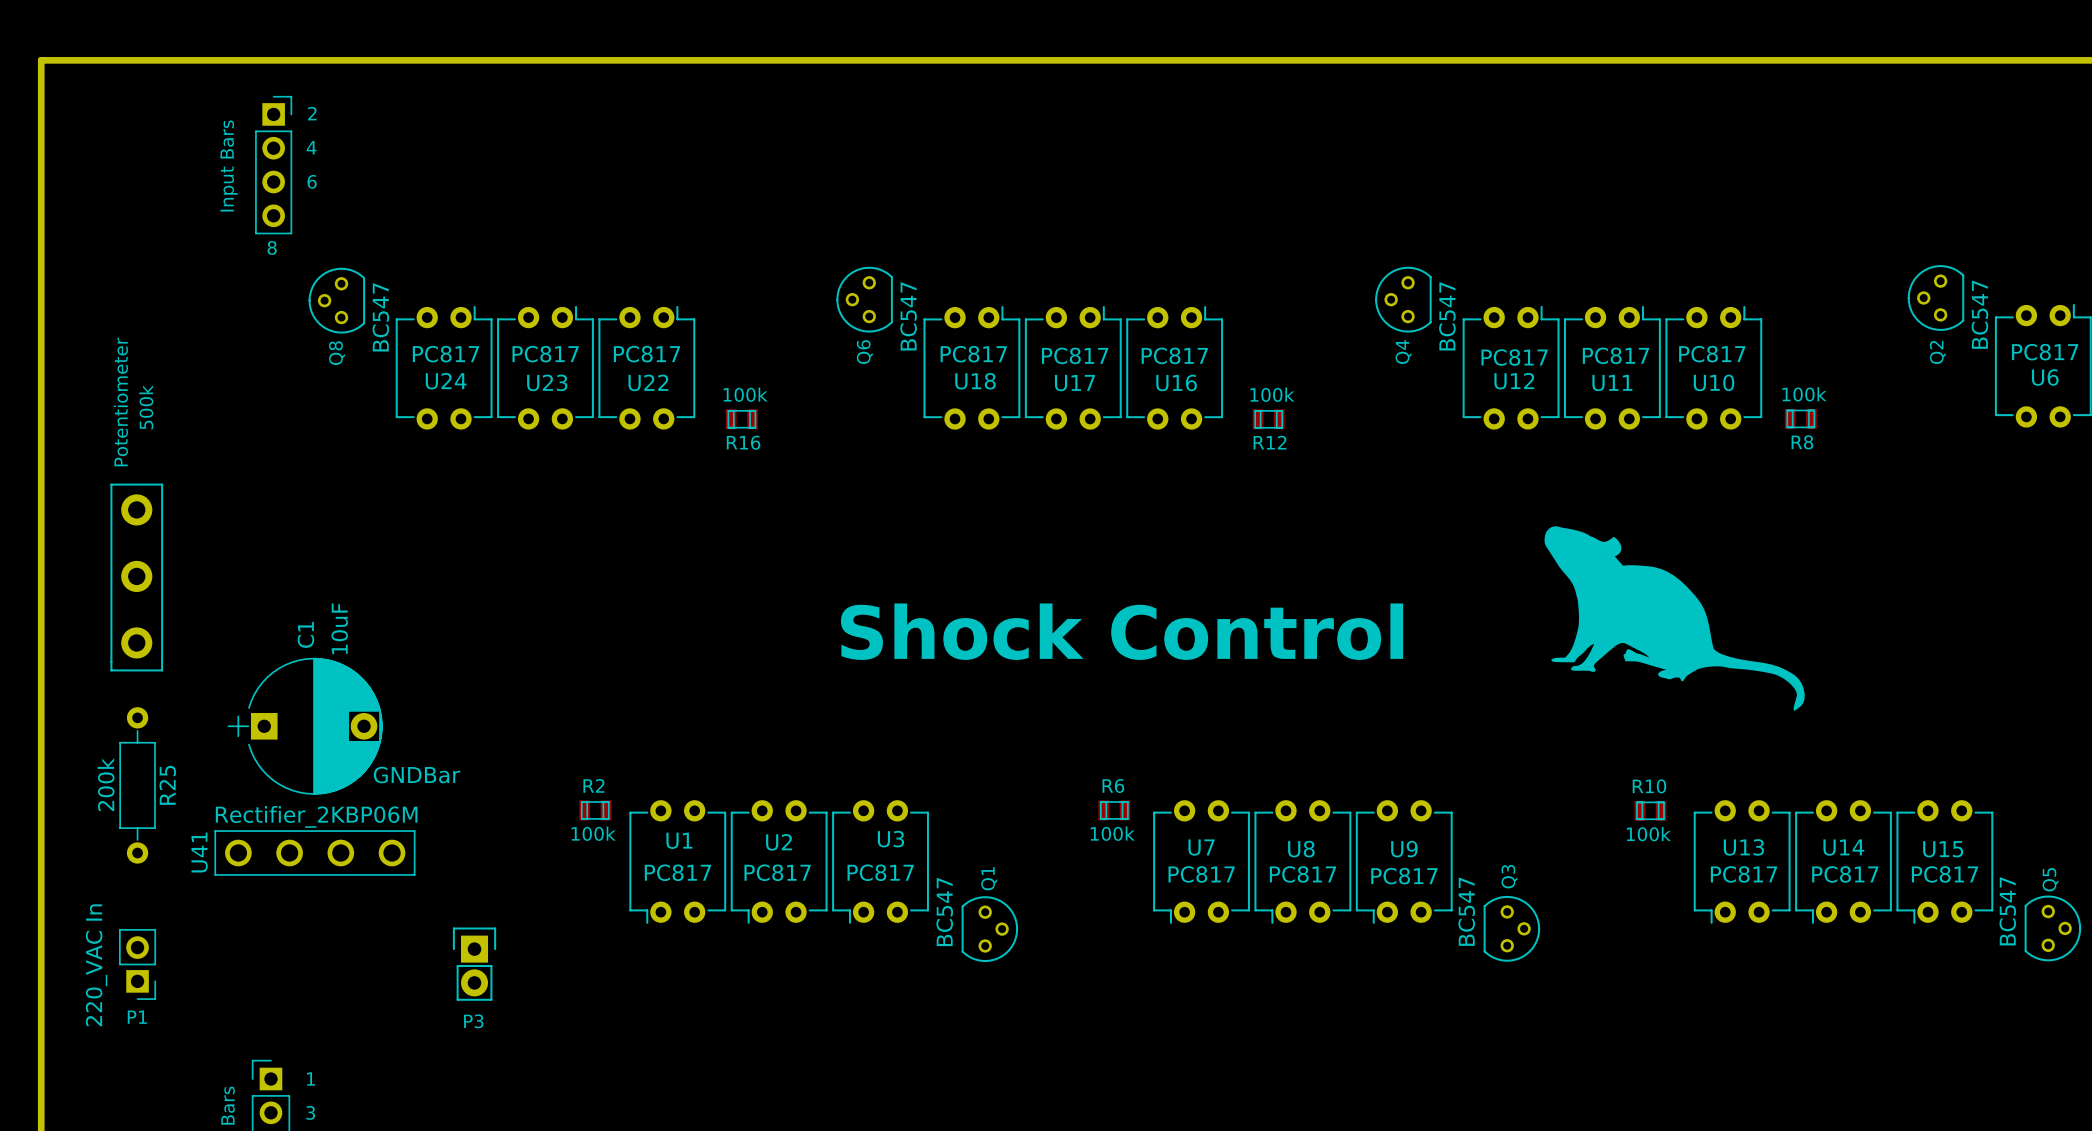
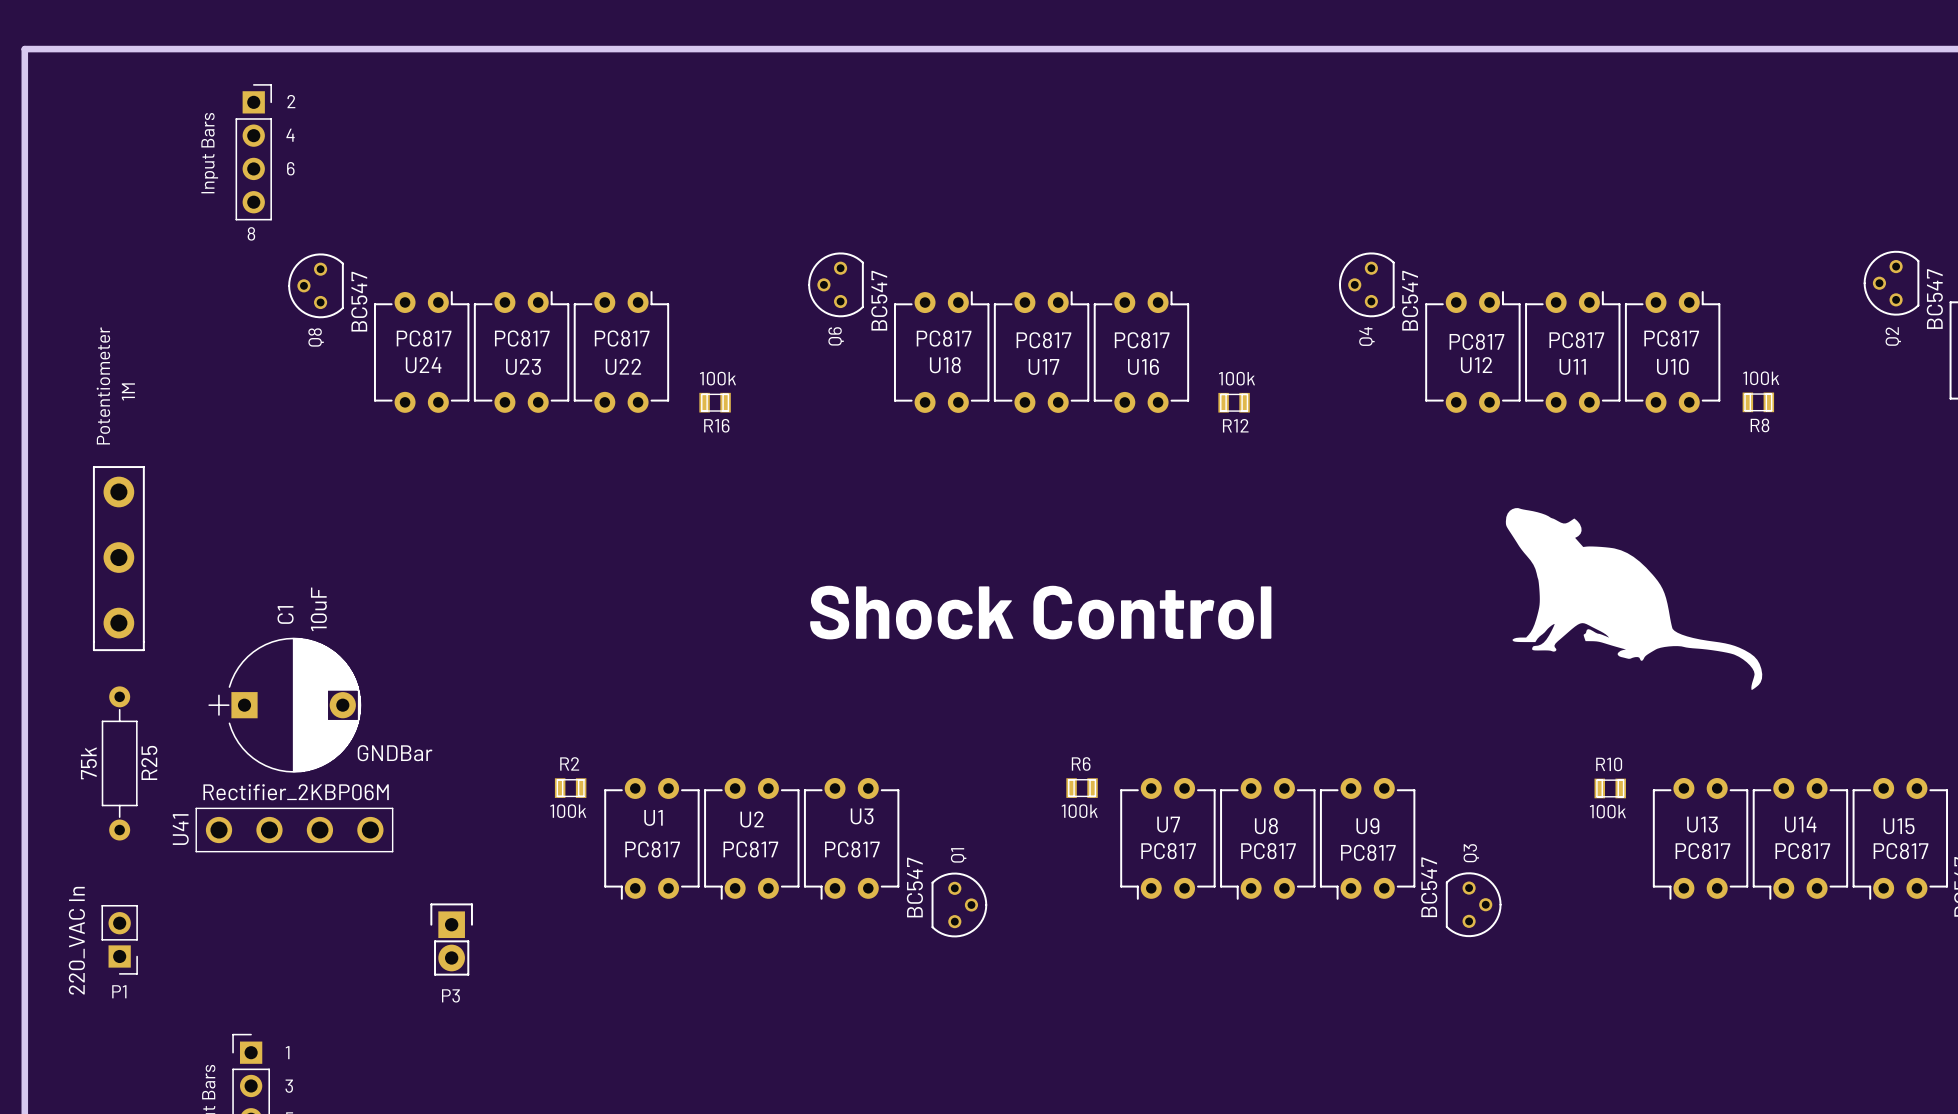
Potentiometer value: 500k (146, 407) -> 1M (128, 391)
R25 value: 200k (106, 784) -> 75k (88, 763)

